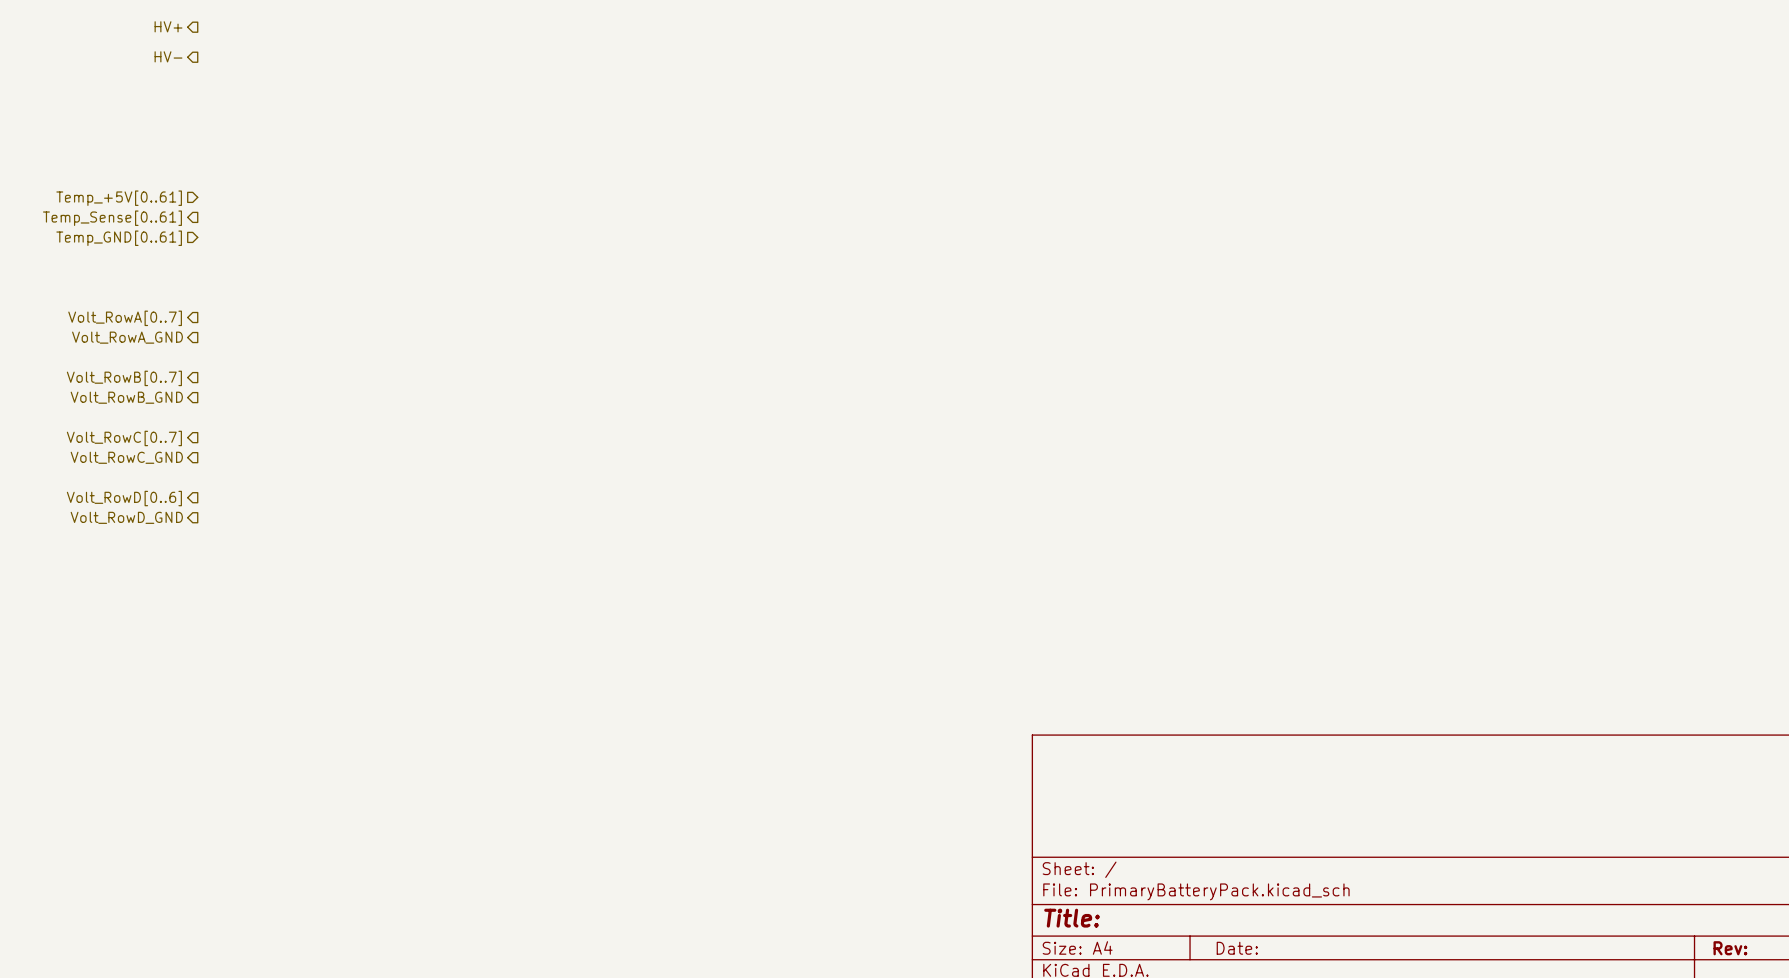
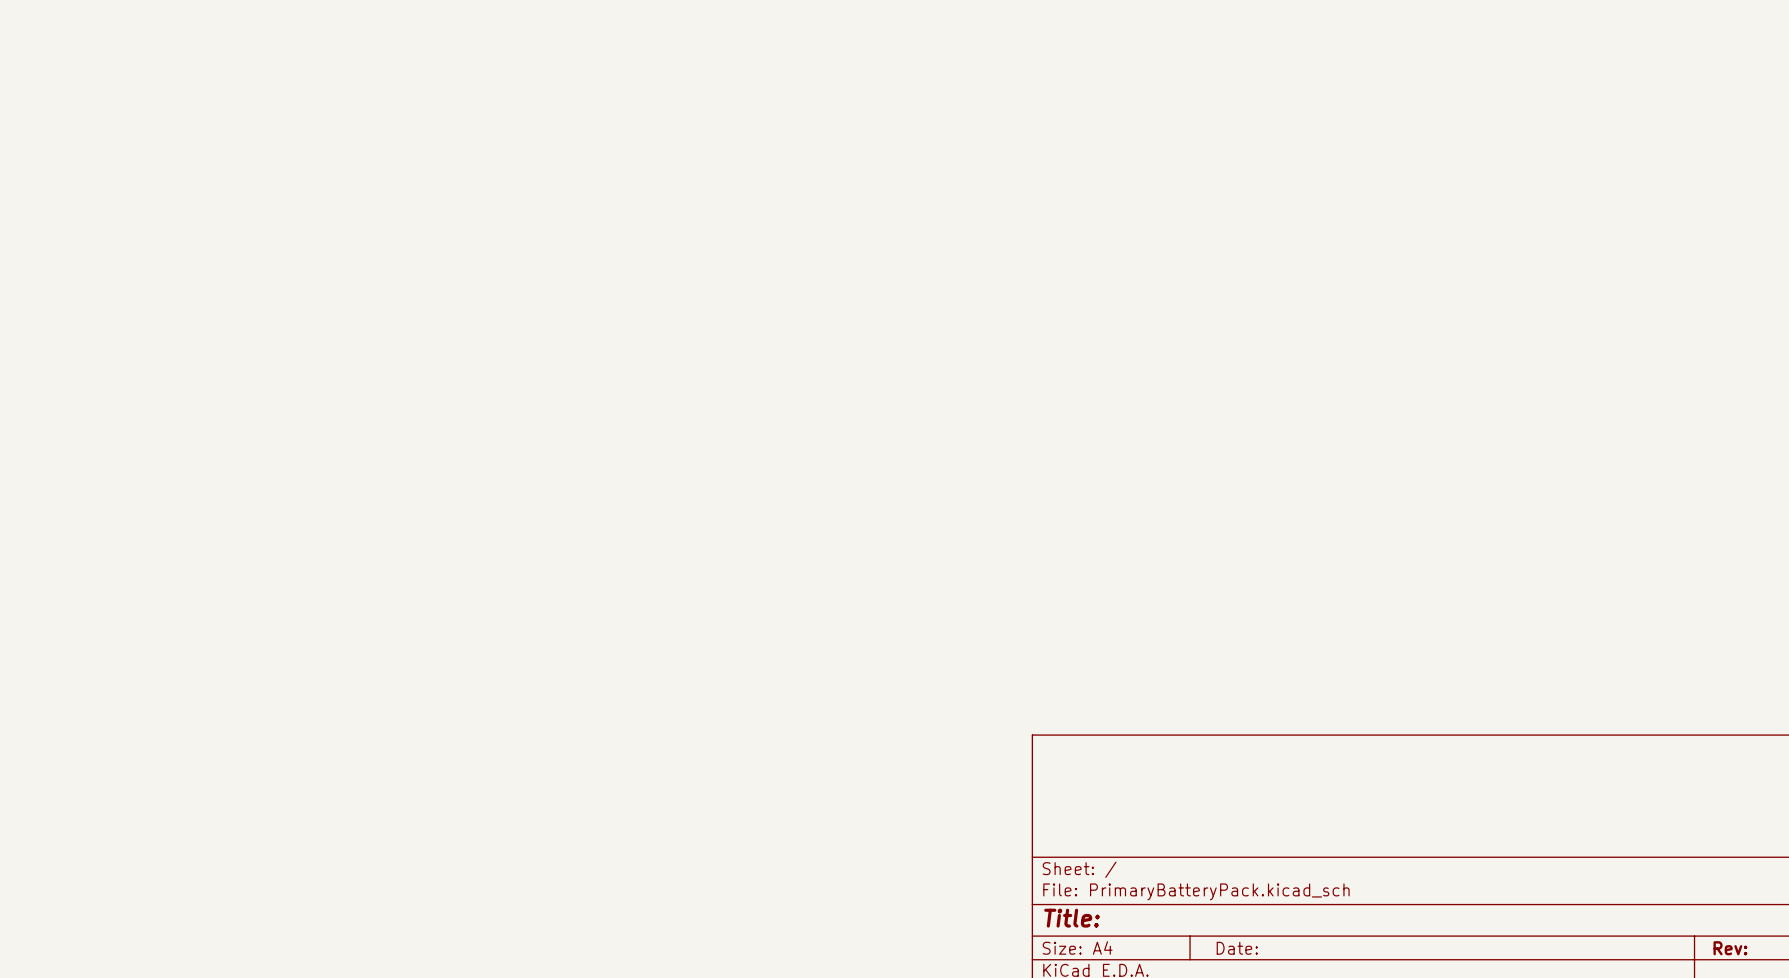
hierarchical label: HV+ (168, 26) -> none
hierarchical label: HV- (168, 56) -> none
hierarchical label: Temp_+5V[0..61] (119, 198) -> none
hierarchical label: Temp_Sense[0..61] (112, 218) -> none
hierarchical label: Temp_GND[0..61] (119, 238) -> none
hierarchical label: Volt_RowA[0..7] (125, 318) -> none
hierarchical label: Volt_RowA_GND (127, 337) -> none
hierarchical label: Volt_RowB[0..7] (124, 378) -> none
hierarchical label: Volt_RowB_GND (126, 397) -> none
hierarchical label: Volt_RowC[0..7] (124, 438) -> none
hierarchical label: Volt_RowC_GND (126, 457) -> none
hierarchical label: Volt_RowD[0..6] (124, 498) -> none
hierarchical label: Volt_RowD_GND (126, 517) -> none

